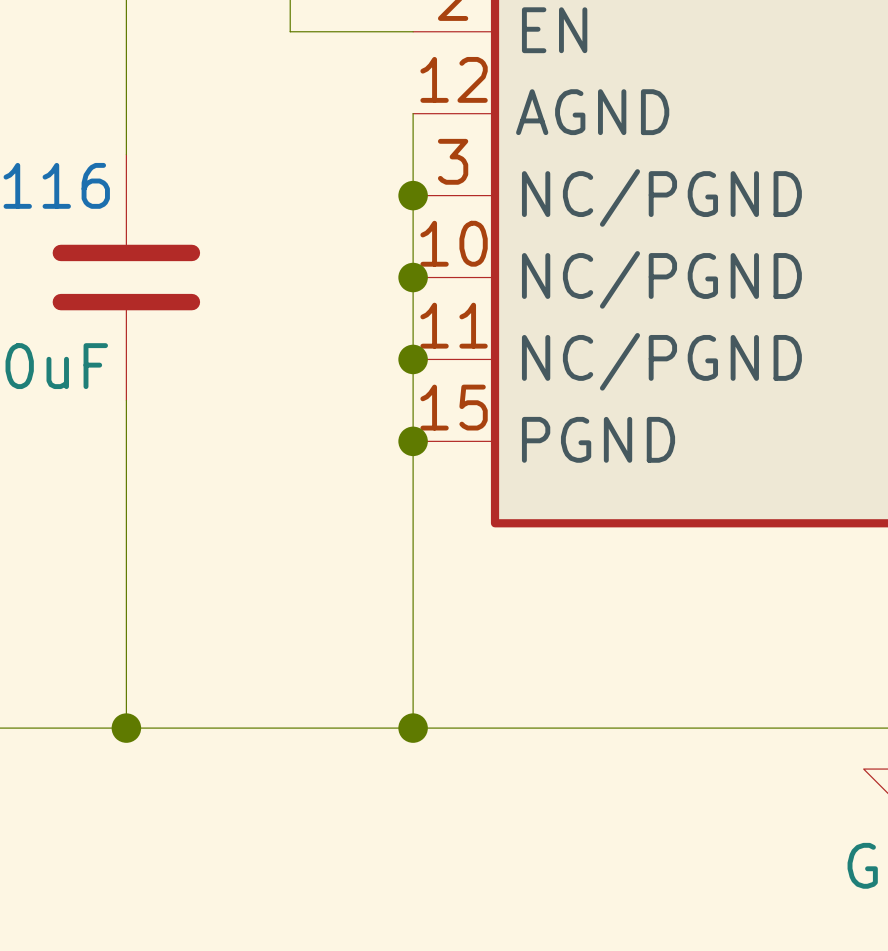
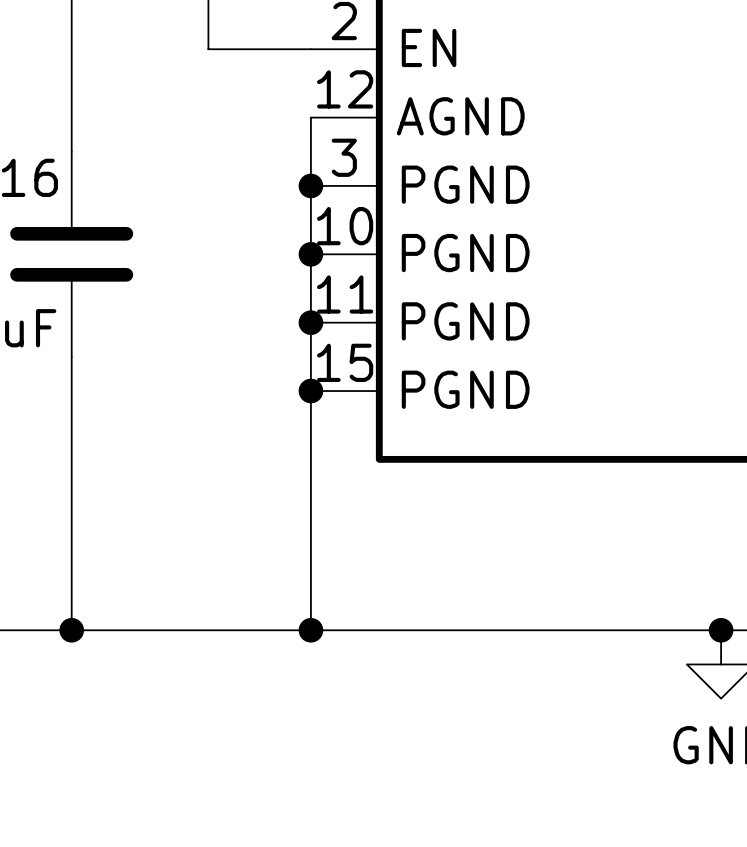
part pin name: NC/PGND (661, 197) -> PGND (465, 184)
part pin name: NC/PGND (661, 279) -> PGND (465, 253)
part pin name: NC/PGND (661, 361) -> PGND (465, 321)

